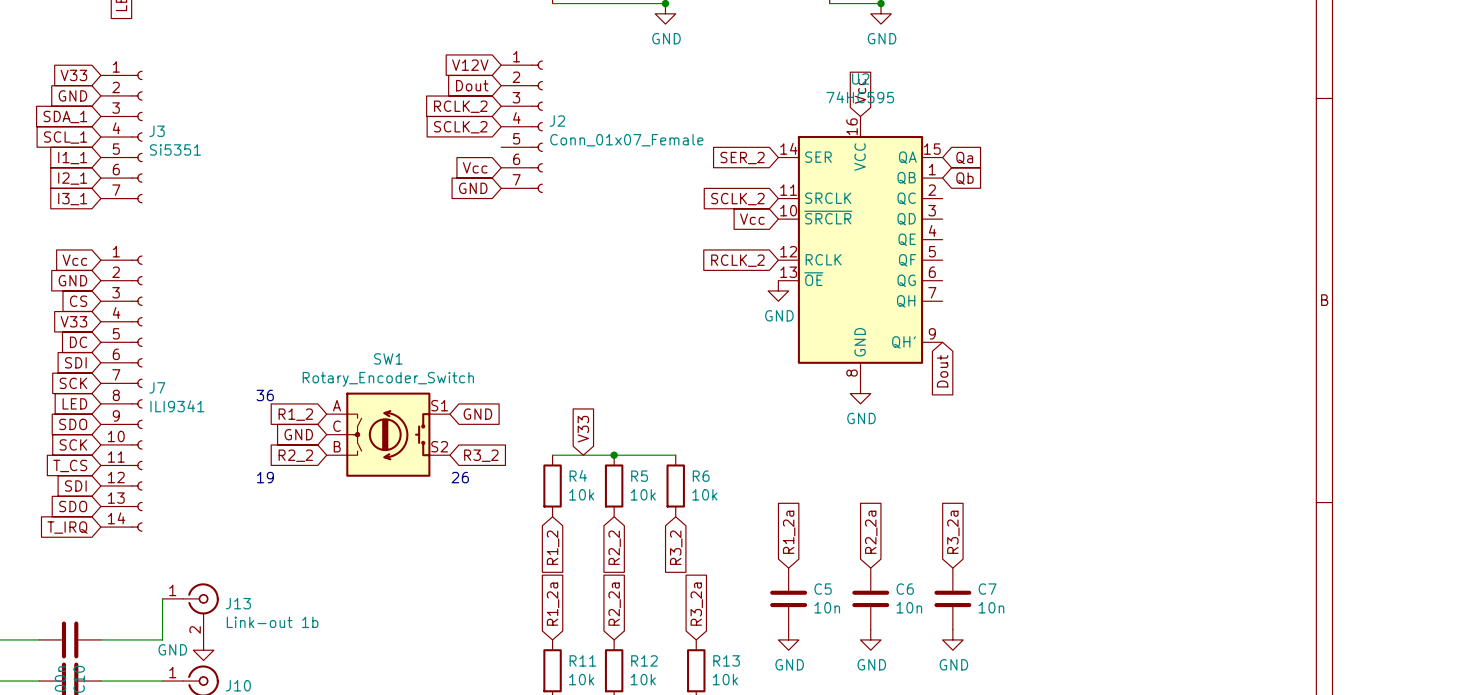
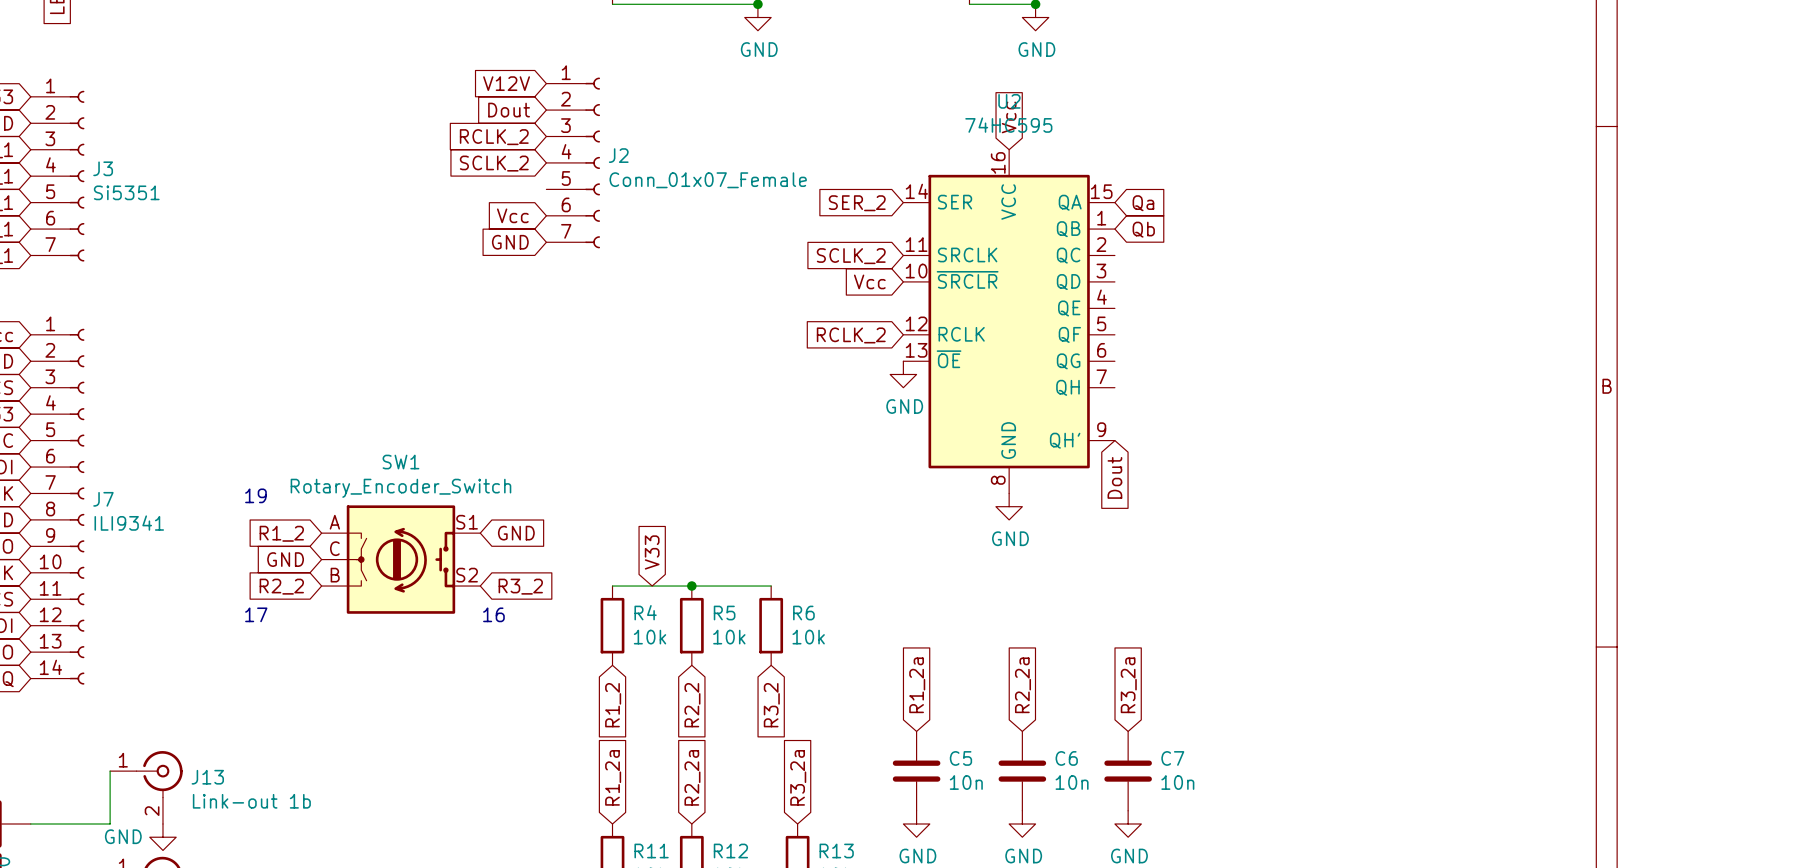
text: 36 (265, 395) -> none
text position: 19 (265, 477) -> 19 (255, 495)
text: none -> 17 (256, 614)
text: 26 (460, 477) -> 16 (493, 614)

